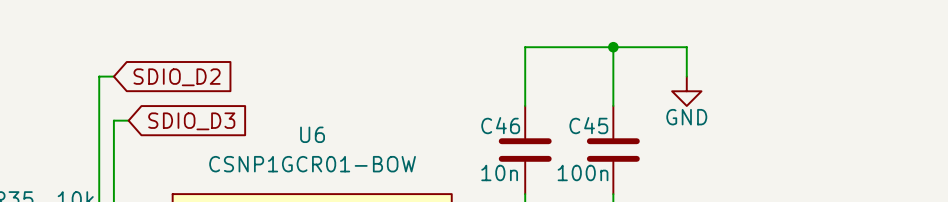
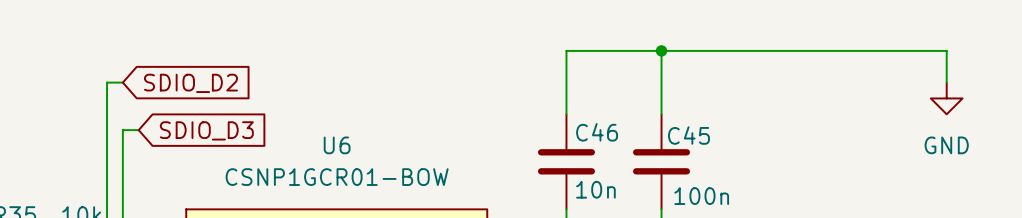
wire: (686, 47) (686, 76) -> (740, 50) (946, 50) (946, 82)
power symbol position: GND (686, 91) -> GND (946, 98)
power symbol text position: GND (686, 117) -> GND (946, 145)
C46 name position: C46 (500, 125) -> C46 (597, 132)
C45 name position: C45 (588, 125) -> C45 (688, 135)
C46 value position: 10n (499, 172) -> 10n (595, 189)
C45 value position: 100n (583, 172) -> 100n (701, 196)

